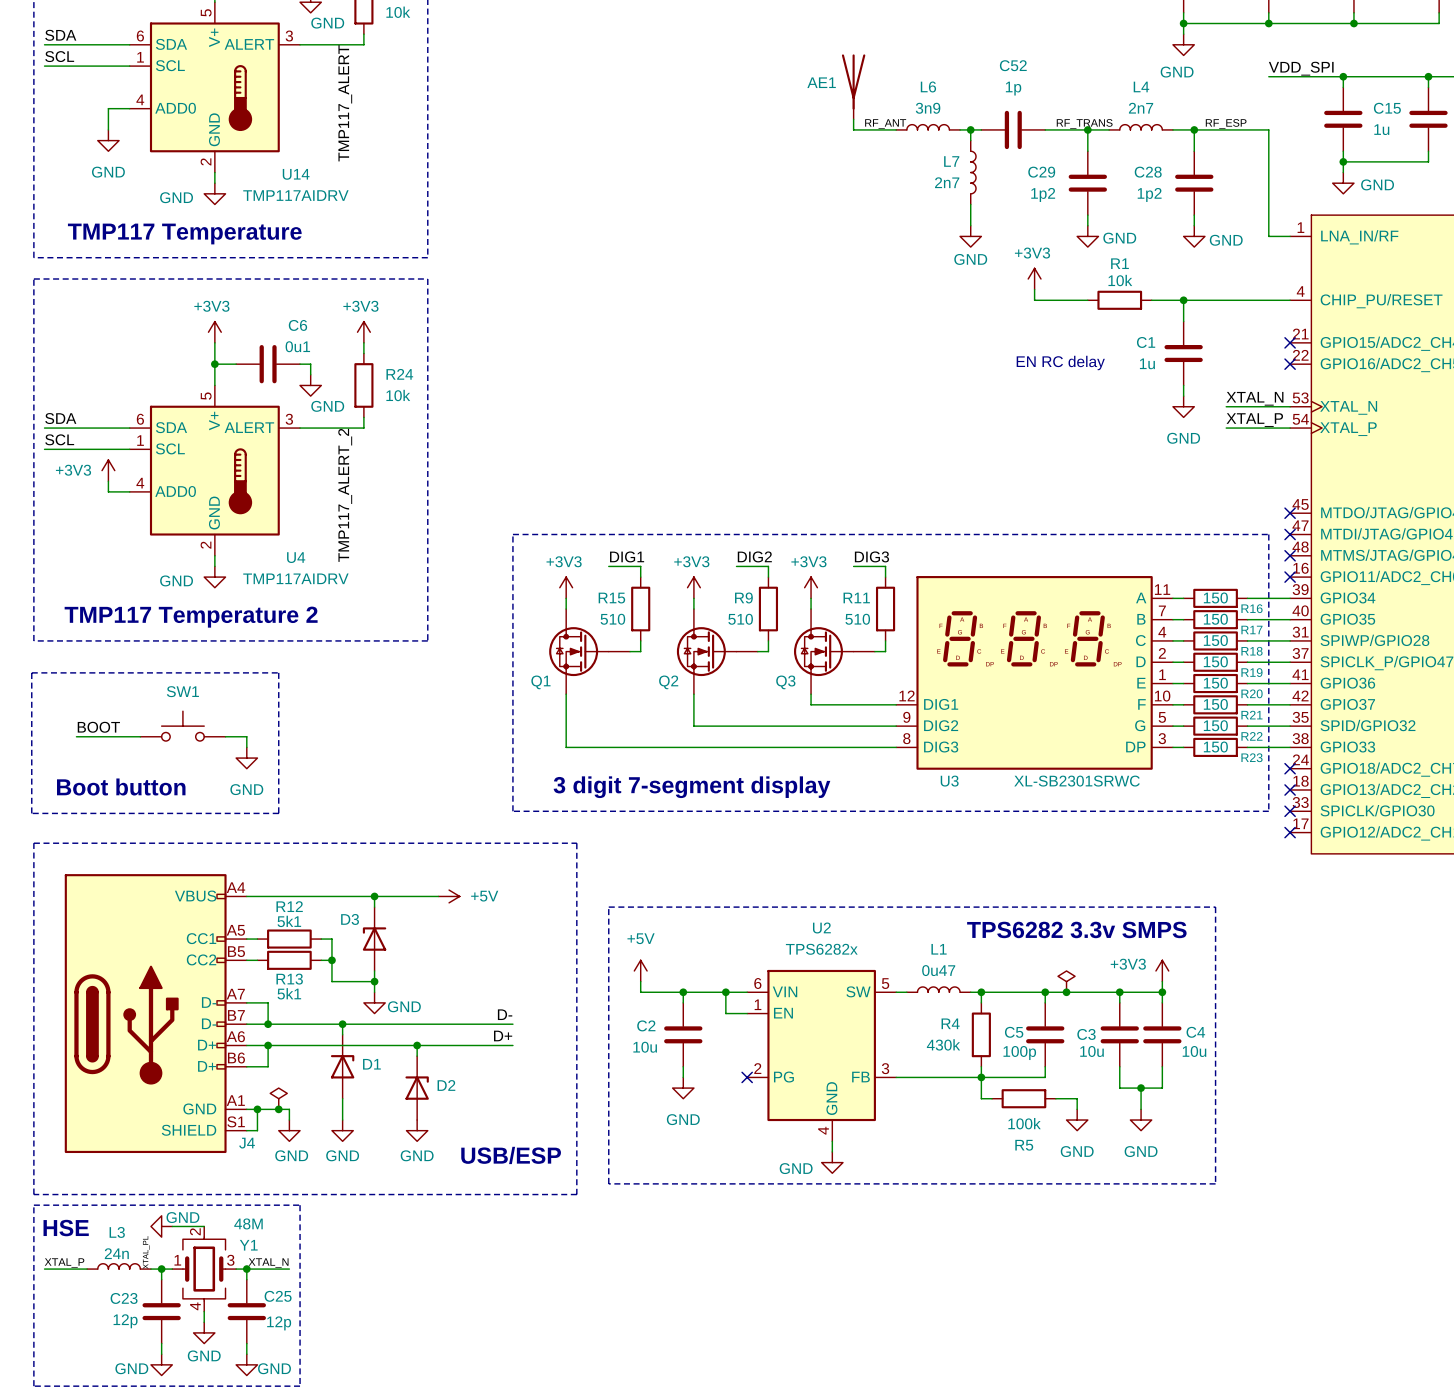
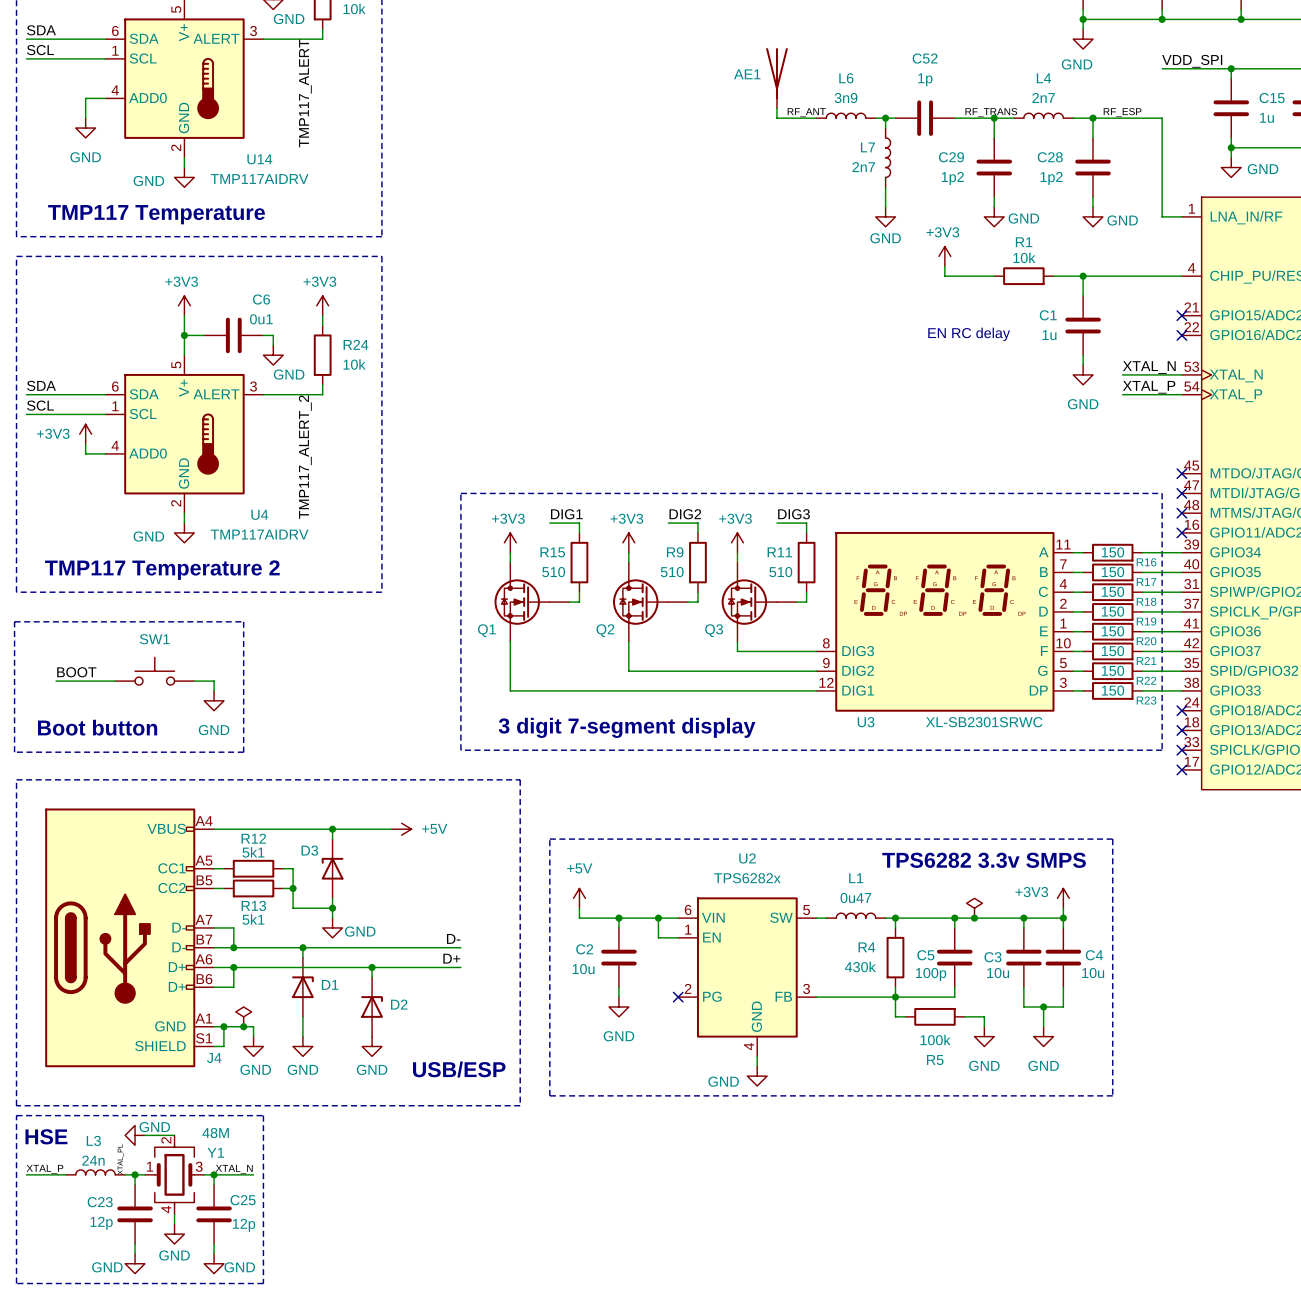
U3 pin number: 12 (907, 695) -> 8 (826, 643)
U3 pin name: DIG1 (941, 704) -> DIG3 (858, 651)
U3 pin number: 8 (906, 738) -> 12 (826, 682)
U3 pin name: DIG3 (941, 747) -> DIG1 (858, 690)

